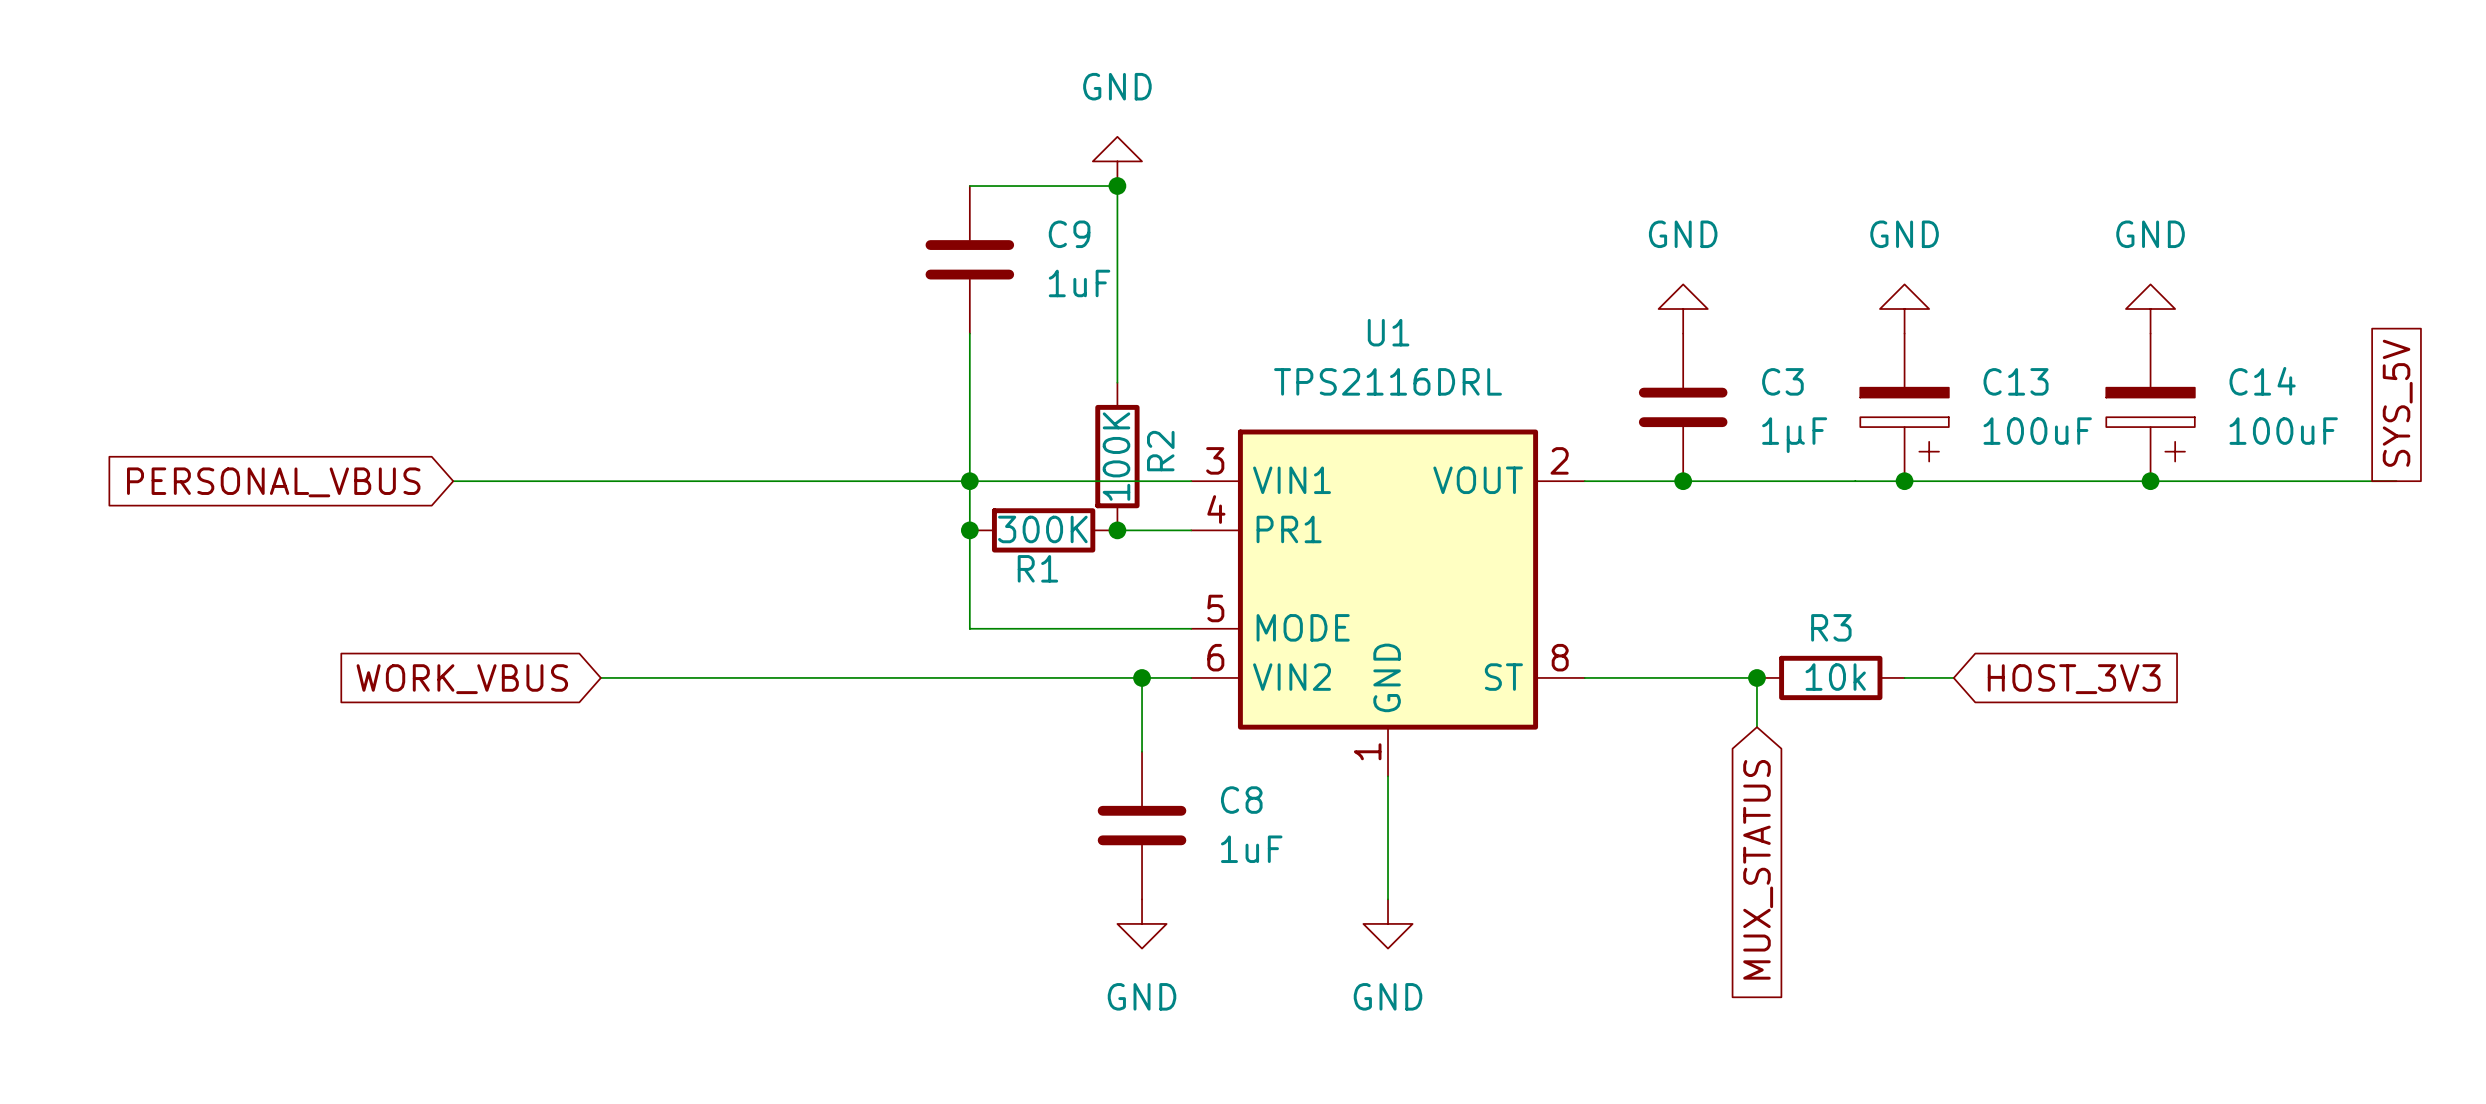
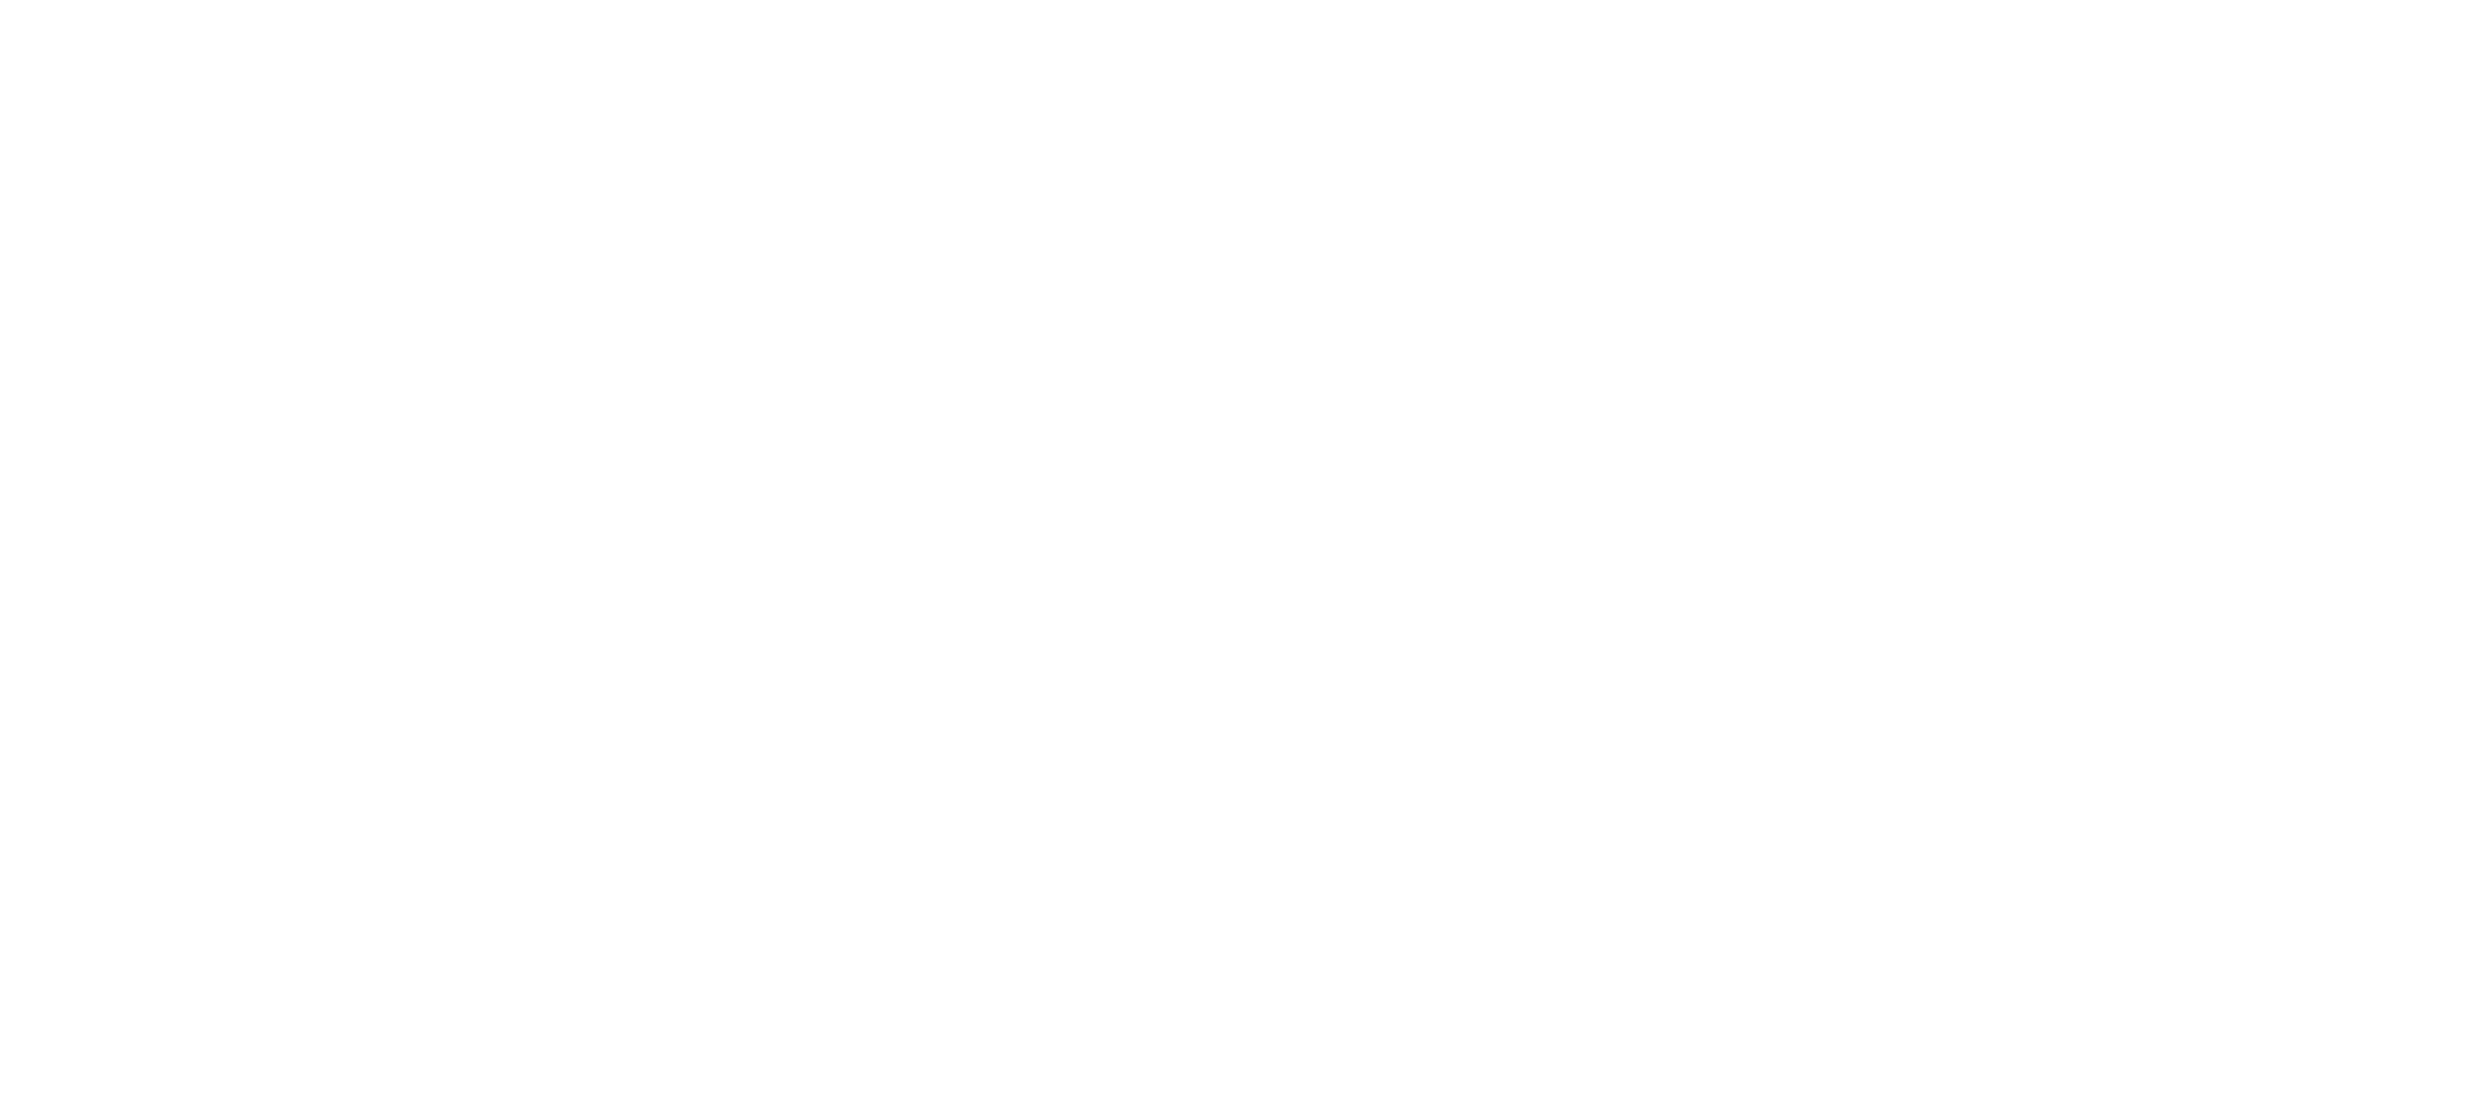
power symbol: GND (1117, 161) -> none
wire: (969, 186) (1117, 186) (1117, 382) -> none
junction: (1117, 186) -> none
C9: 1uF (969, 259) -> none
power symbol: GND (1683, 309) -> none
power symbol: GND (1904, 309) -> none
power symbol: GND (2150, 309) -> none
wire: (969, 333) (969, 628) (1191, 628) -> none
global label: SYS_5V (2397, 403) -> none
C3: 1µF (1683, 407) -> none
C13: 100uF (1904, 407) -> none
C14: 100uF (2150, 407) -> none
R2: 100K (1117, 456) -> none
wire: (453, 481) (1191, 481) -> none
junction: (969, 481) -> none
wire: (1584, 481) (2396, 481) -> none
junction: (1683, 481) -> none
junction: (1904, 481) -> none
junction: (2150, 481) -> none
global label: PERSONAL_VBUS (273, 482) -> none
junction: (969, 530) -> none
R1: 300K (1043, 530) -> none
wire: (1117, 530) (1191, 530) -> none
junction: (1117, 530) -> none
U1: TPS2116DRL (1388, 602) -> none
wire: (600, 677) (1191, 677) -> none
wire: (1142, 677) (1142, 751) -> none
junction: (1142, 677) -> none
wire: (1584, 677) (1756, 677) (1756, 727) -> none
junction: (1756, 677) -> none
R3: 10k (1830, 677) -> none
wire: (1904, 677) (1953, 677) -> none
global label: WORK_VBUS (462, 679) -> none
global label: HOST_3V3 (2074, 679) -> none
wire: (1388, 776) (1388, 899) -> none
C8: 1uF (1142, 825) -> none
global label: MUX_STATUS (1758, 869) -> none
power symbol: GND (1142, 923) -> none
power symbol: GND (1388, 923) -> none

